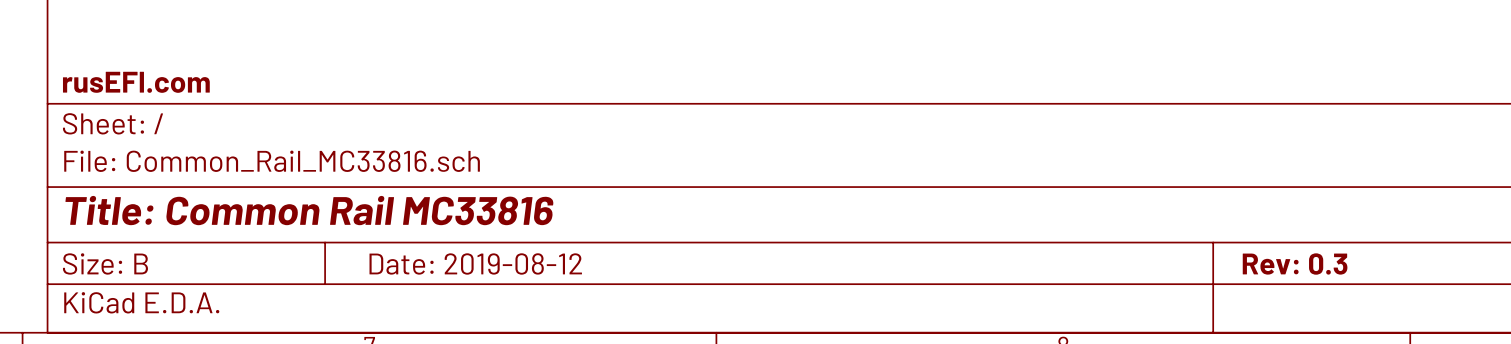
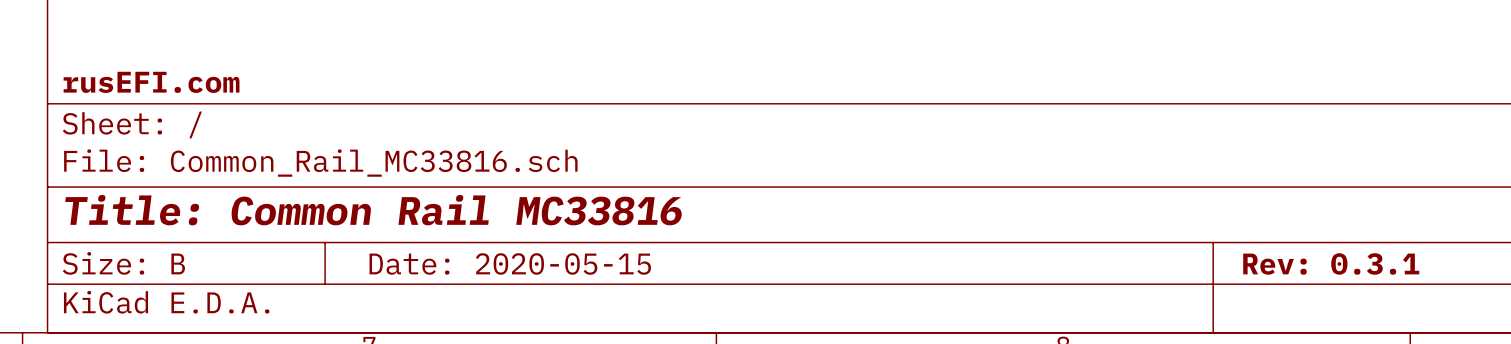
title block: Date: 2019-08-12 (475, 263) -> Date: 2020-05-15 (510, 263)
title block: Rev: 0.3 (1295, 264) -> Rev: 0.3.1 (1331, 263)

